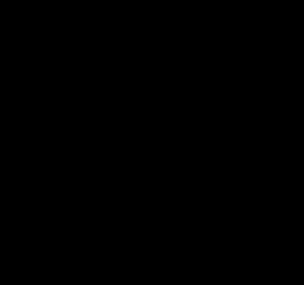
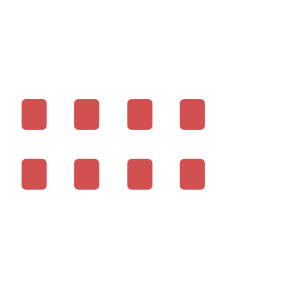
part: none -> (60, 114)
part: none -> (166, 114)
part: none -> (60, 174)
part: none -> (166, 174)

